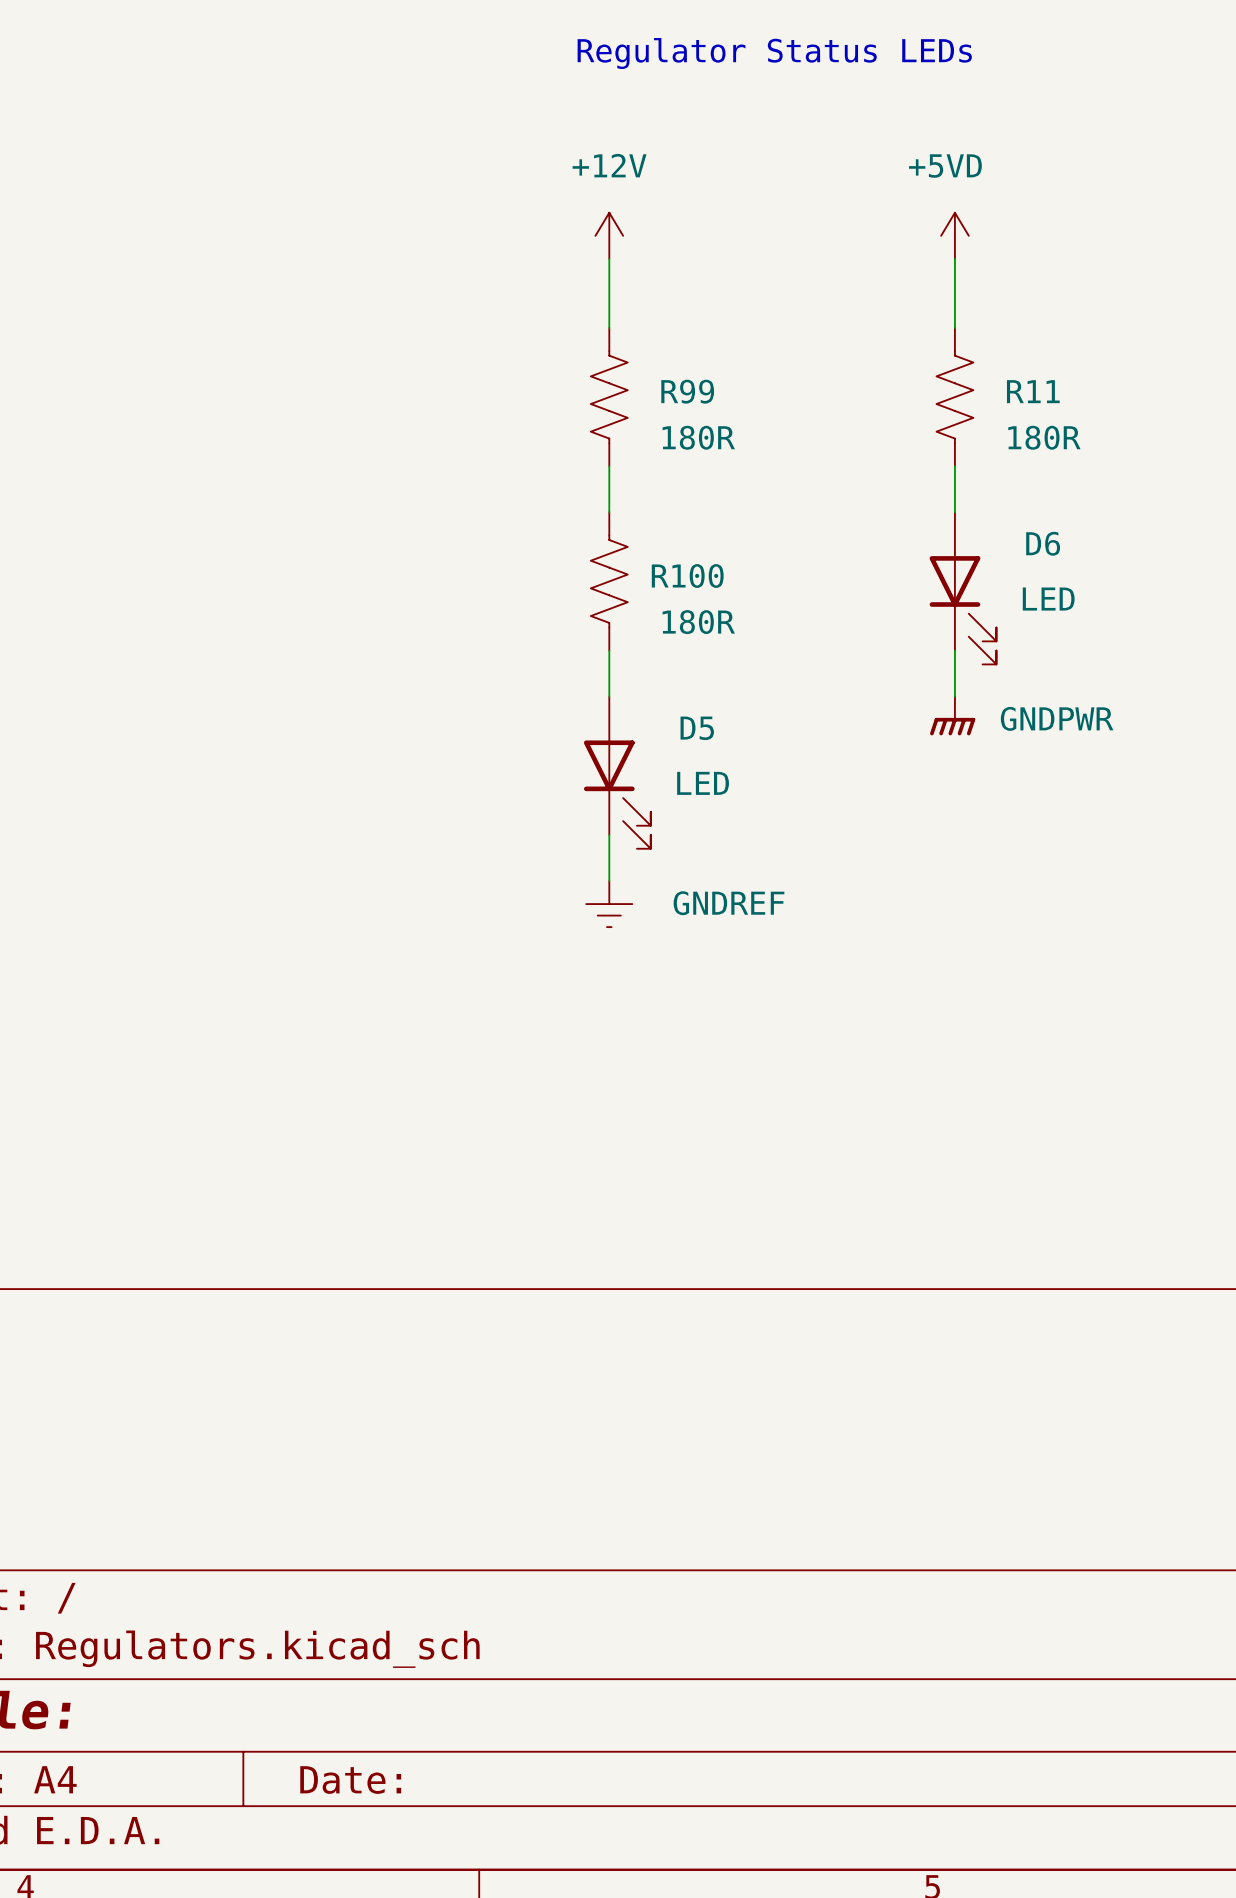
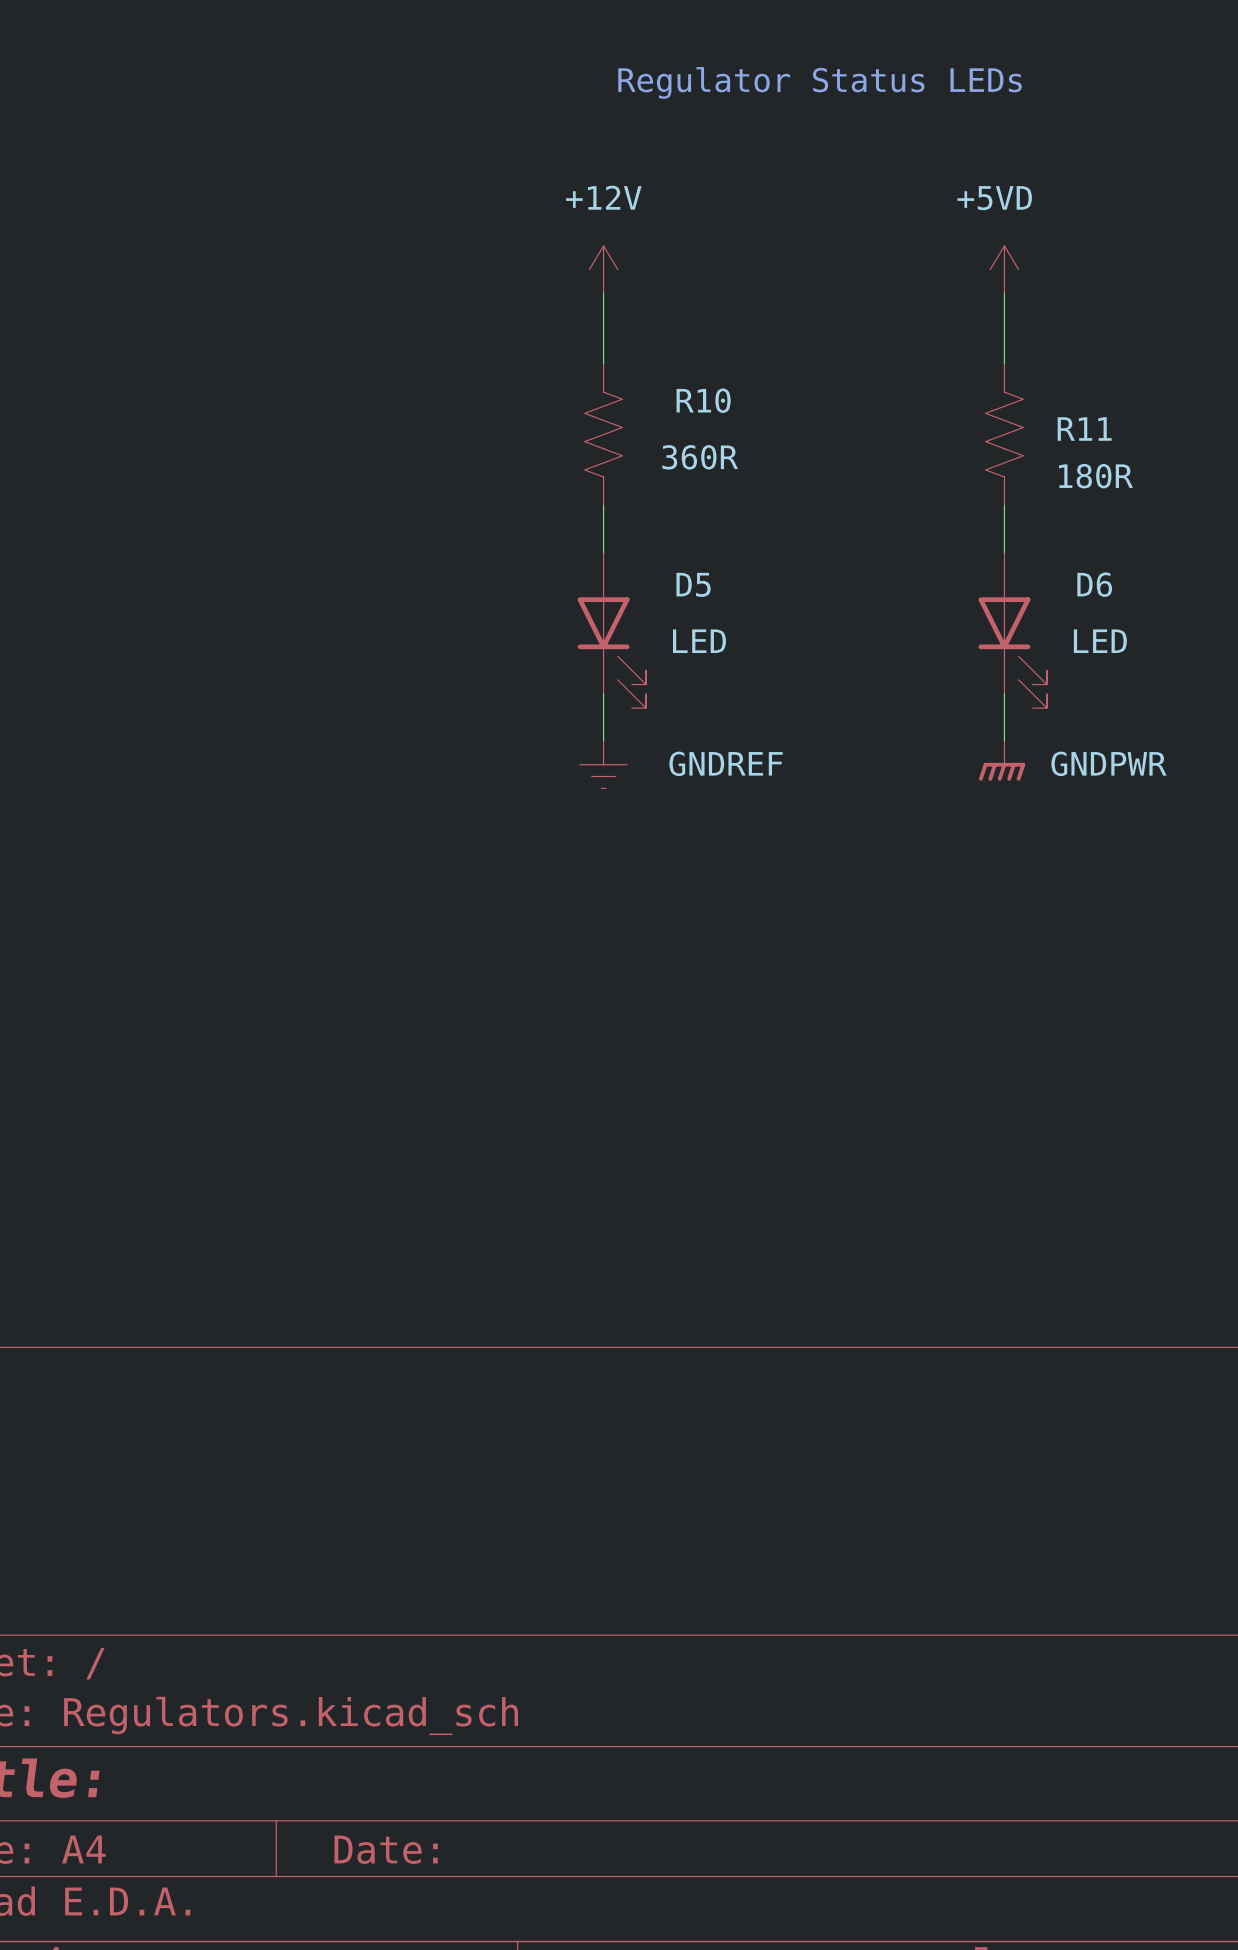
power symbol position: +12V (609, 235) -> +12V (603, 269)
wire: (609, 258) (609, 327) -> (603, 293) (603, 363)
R10: none -> 360R (603, 434)
R99: 180R (609, 397) -> none
wire: (609, 466) (609, 512) -> (603, 505) (603, 552)
R100: 180R (609, 581) -> none
wire: (609, 650) (609, 696) -> (603, 693) (603, 741)
D5 position: (617, 772) -> (611, 630)
wire: (609, 834) (609, 881) -> none
power symbol position: GNDREF (609, 904) -> GNDREF (603, 764)

